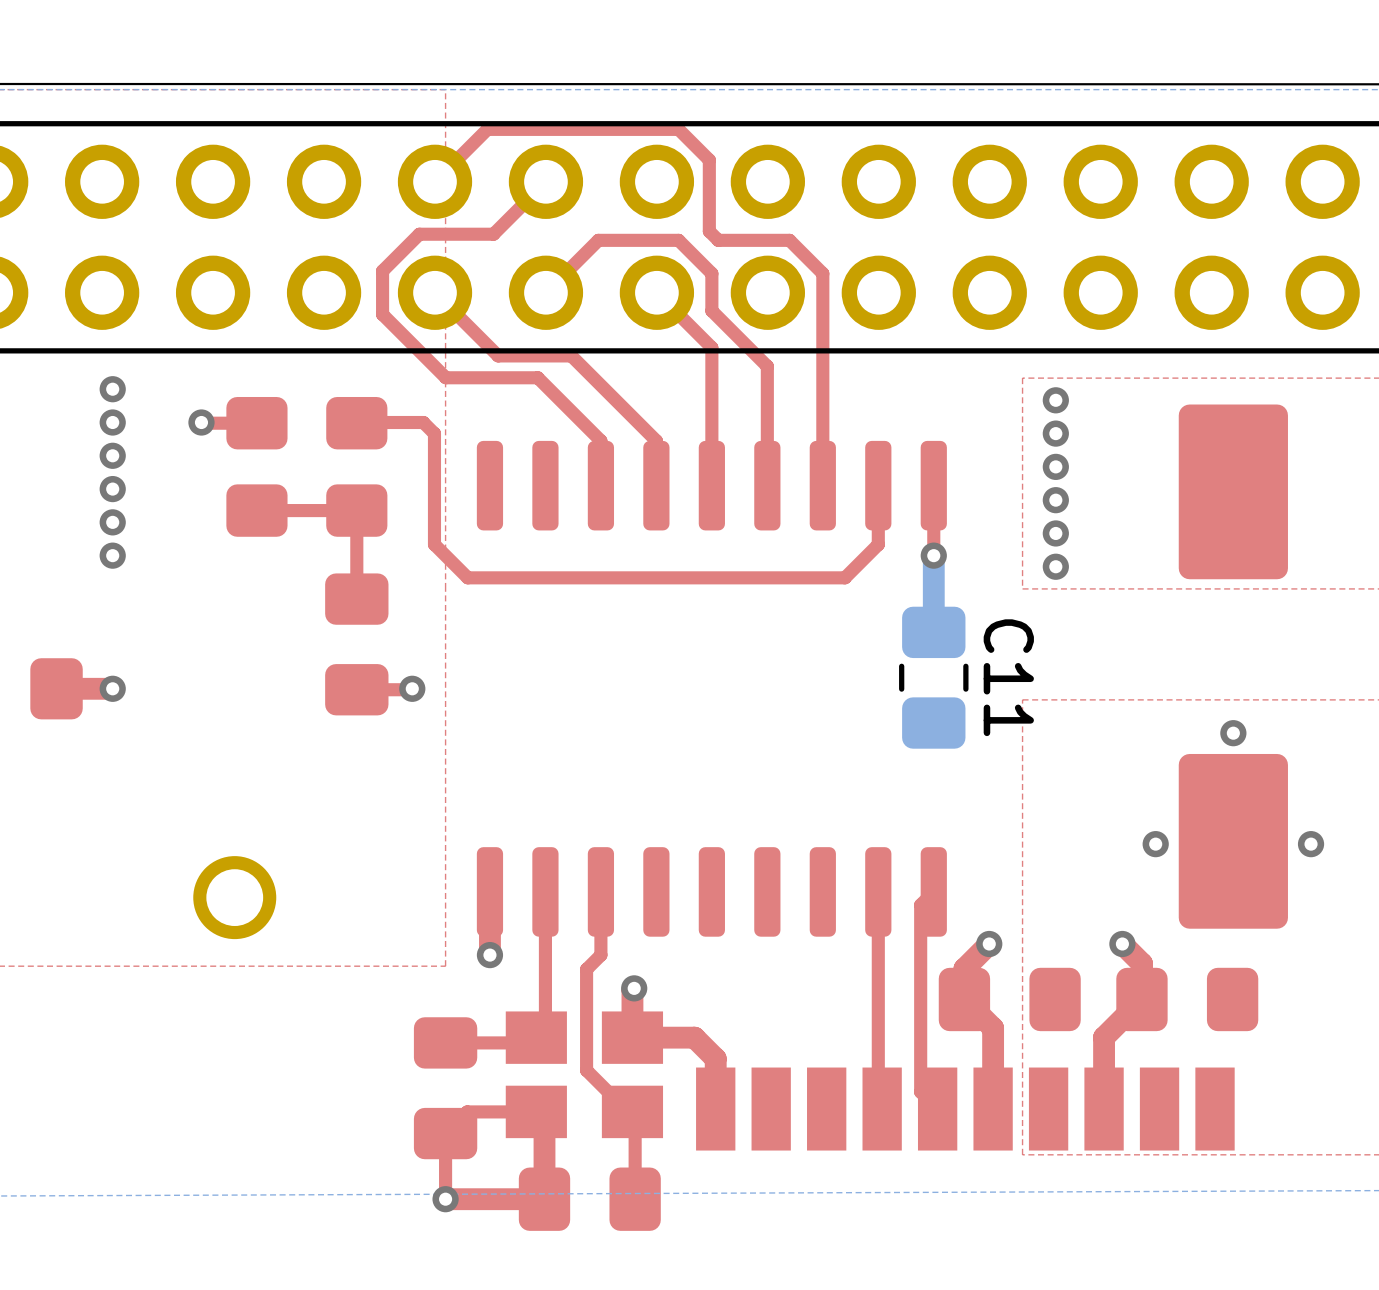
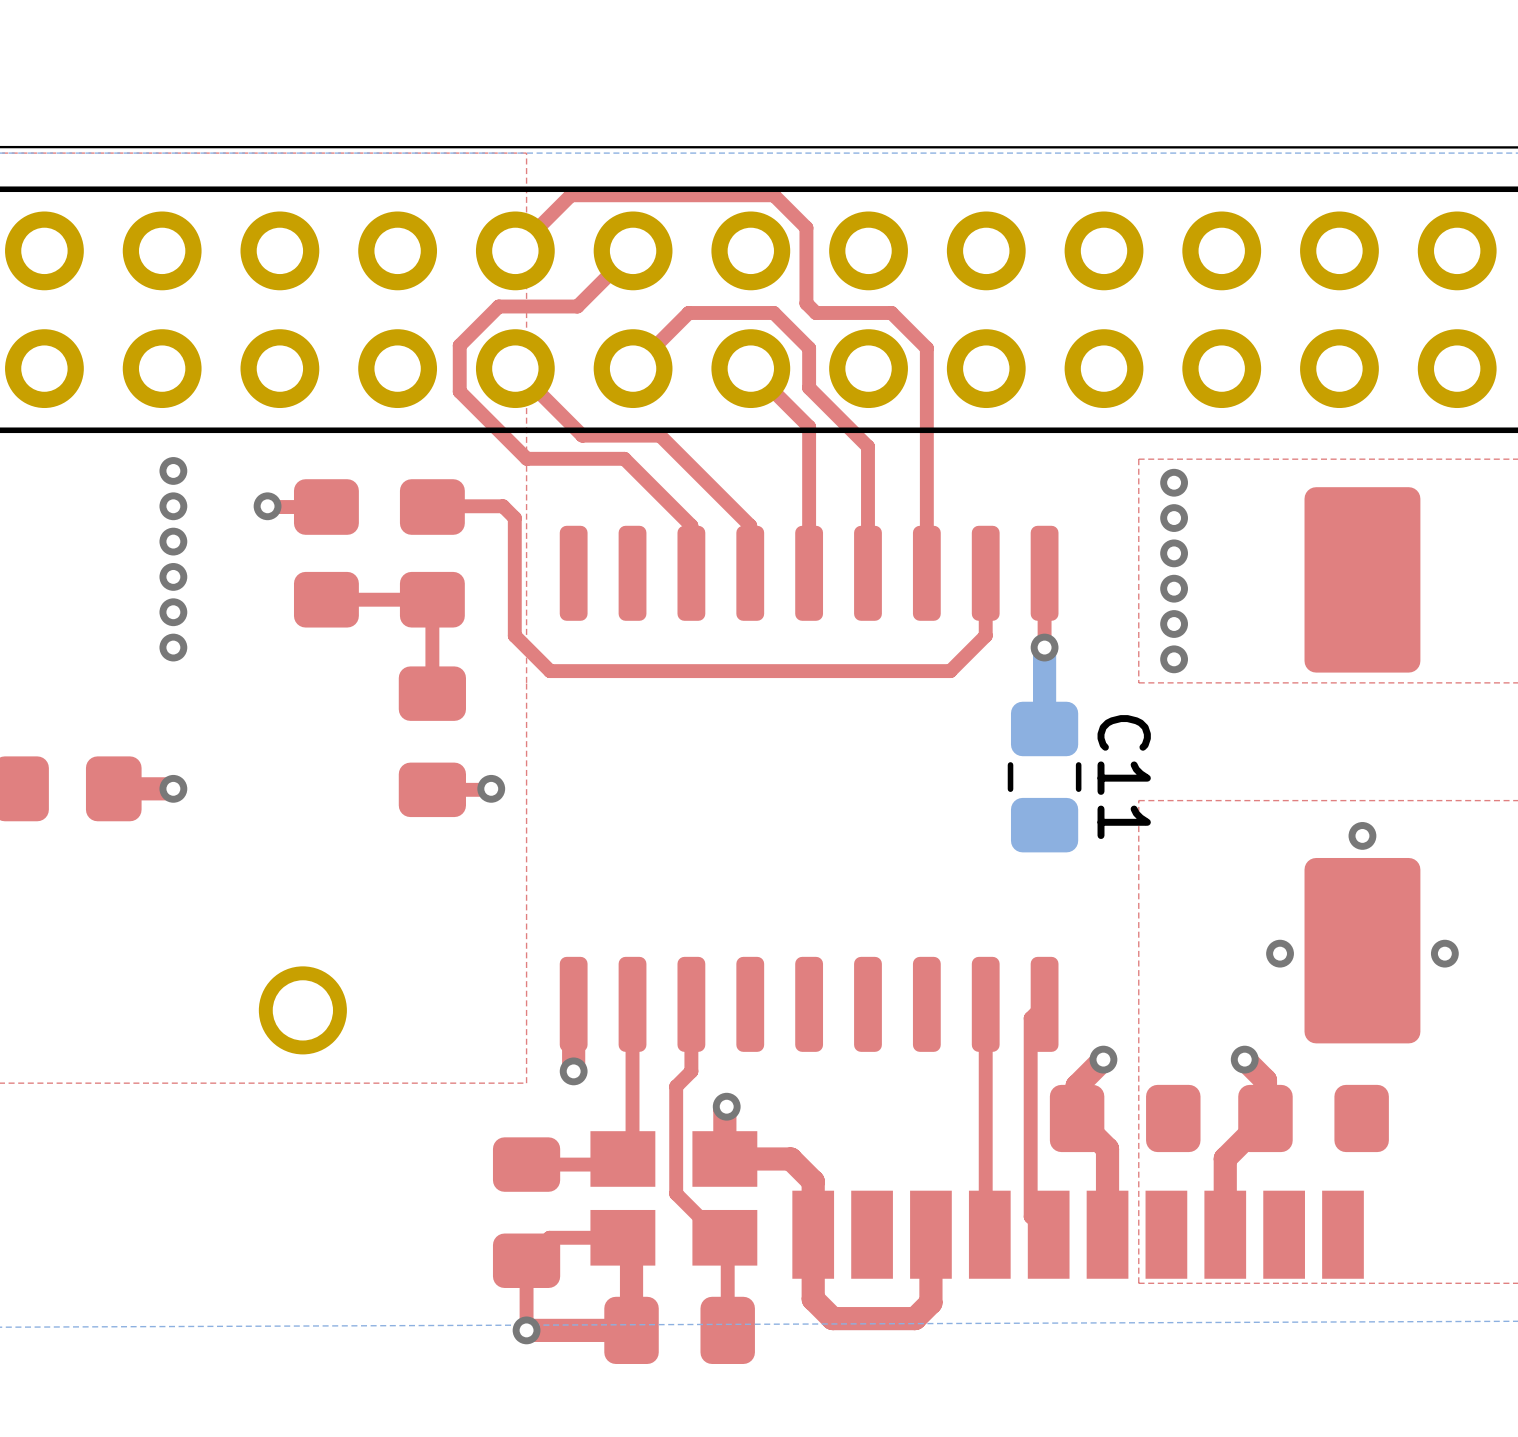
top track: none -> (930, 1234) (930, 1302) (915, 1318) (832, 1318) (813, 1299) (813, 1234)

